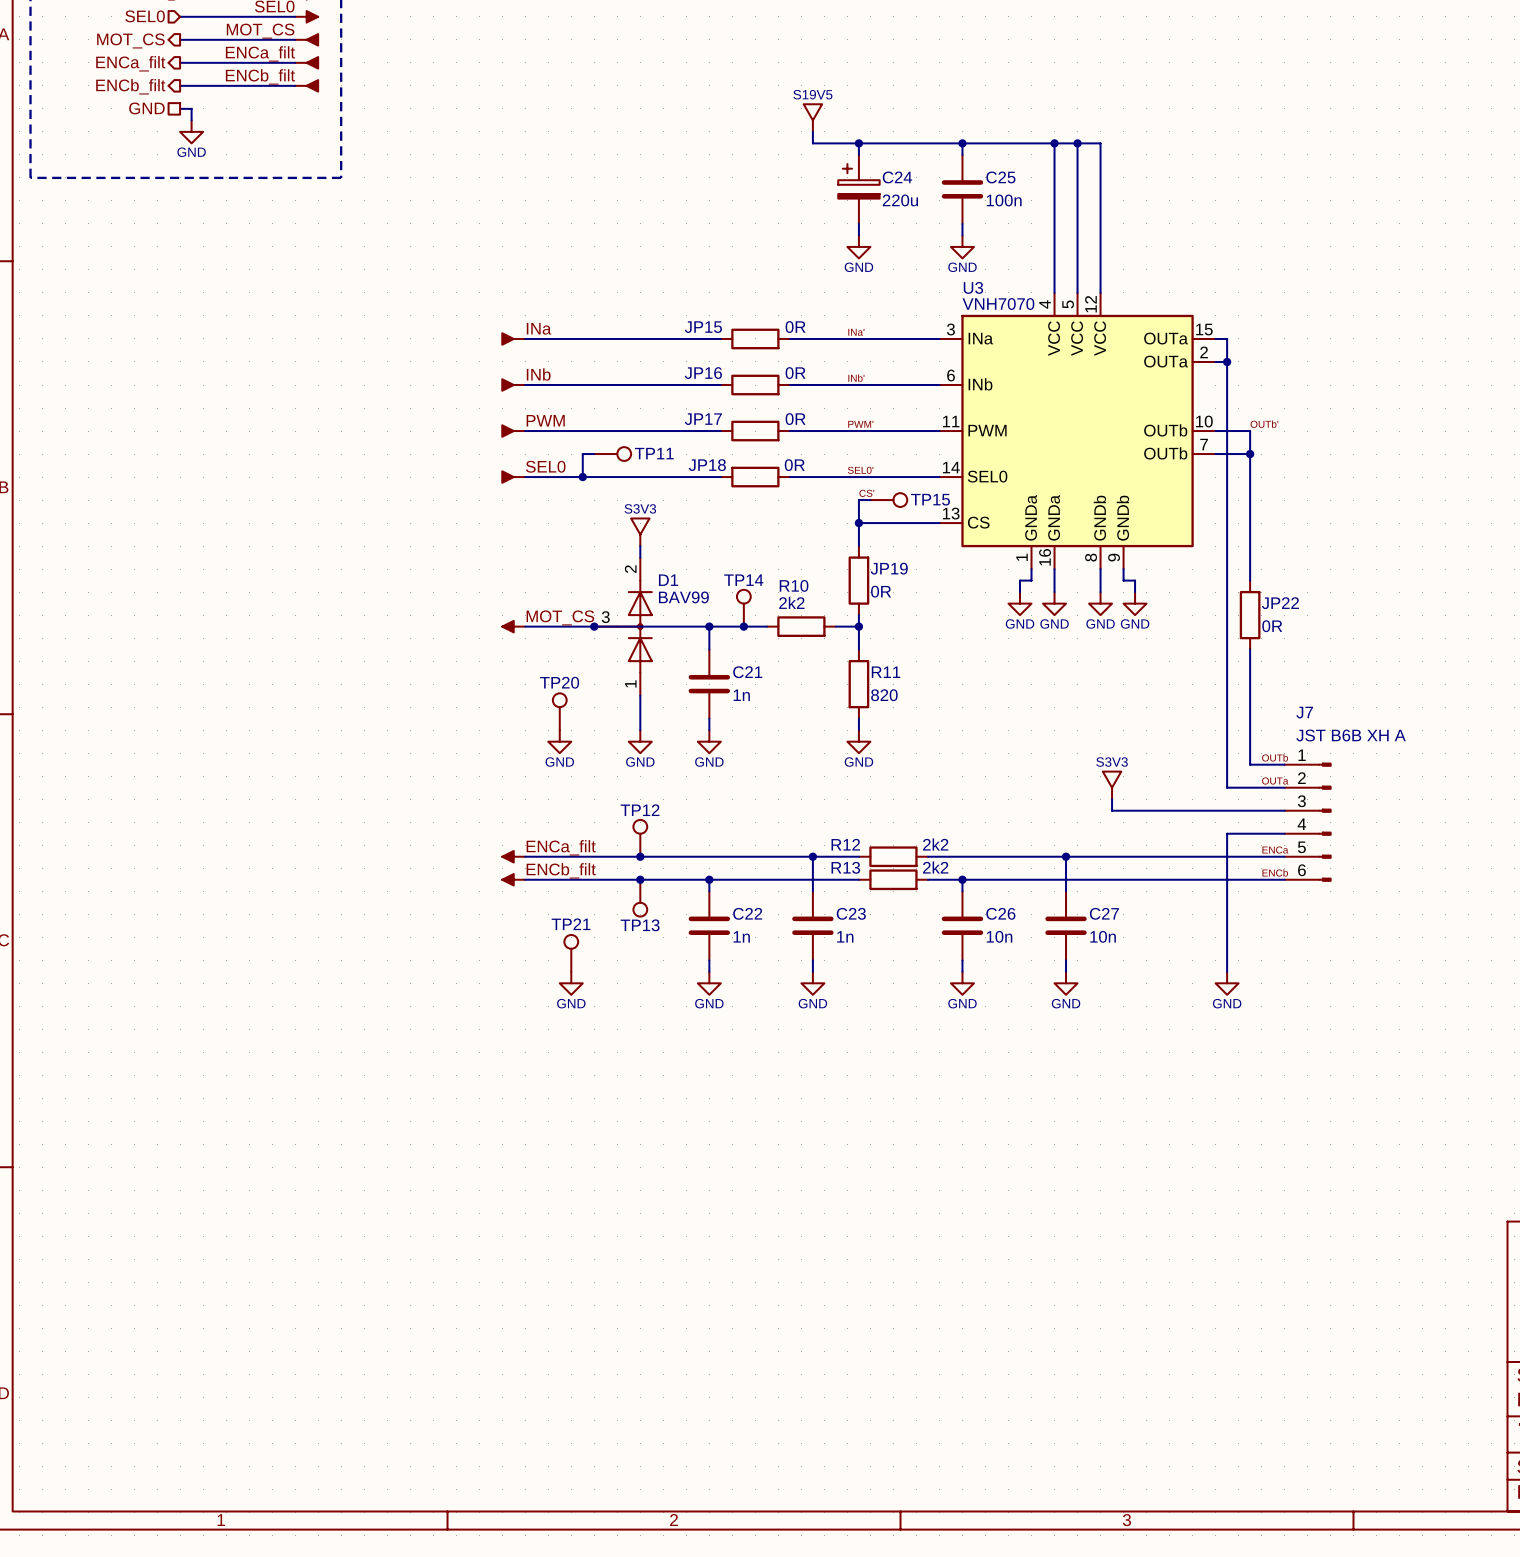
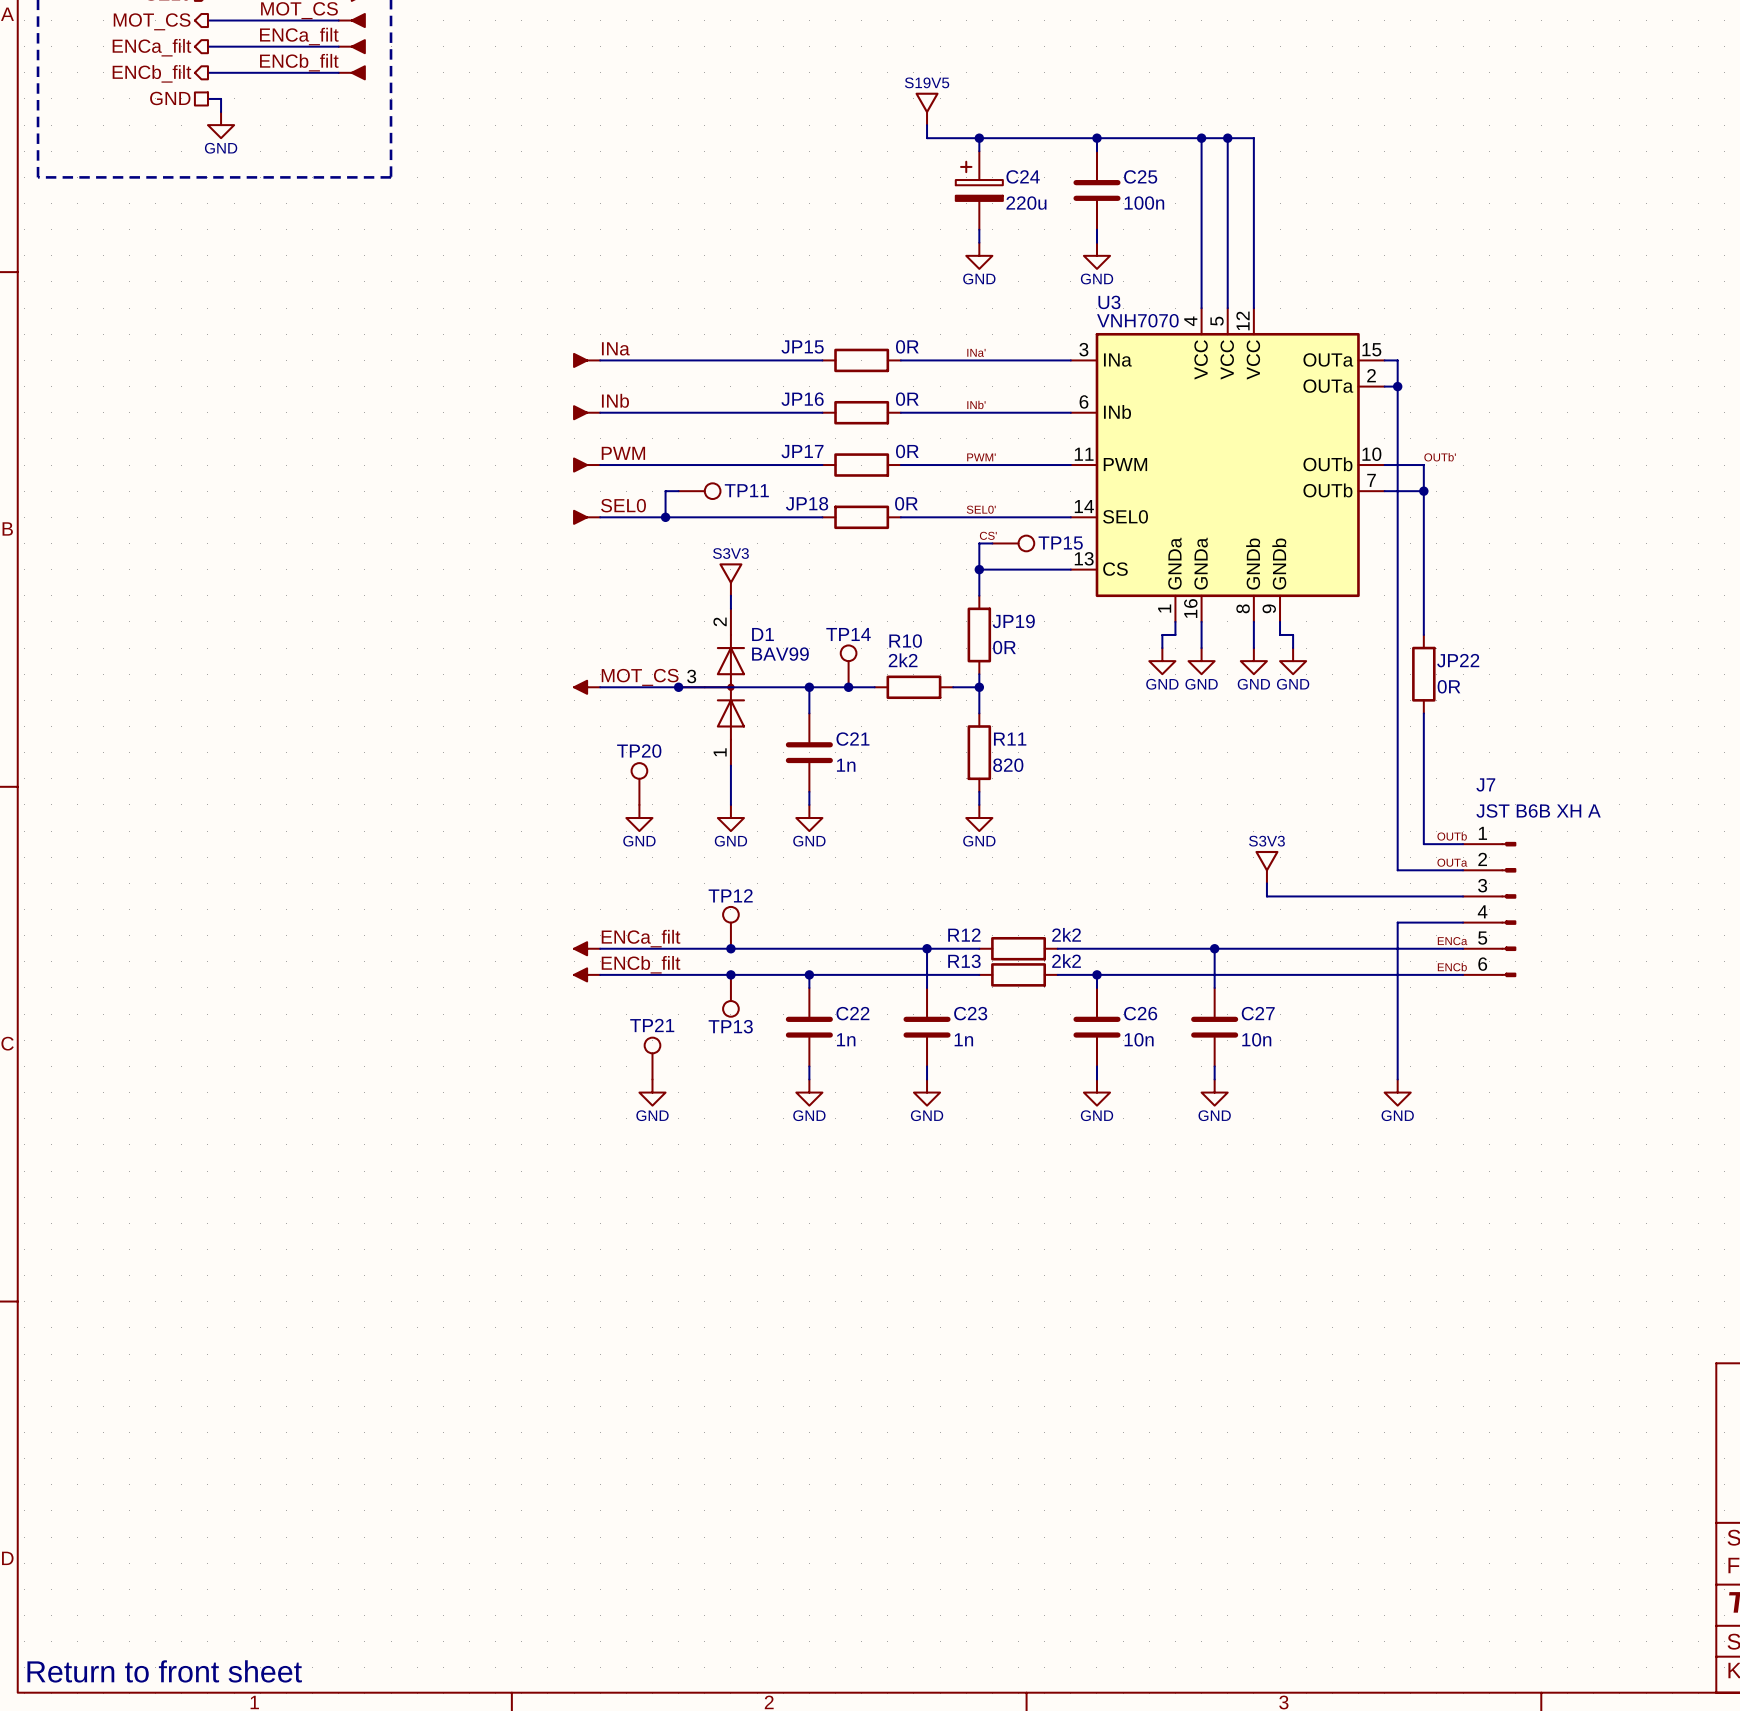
text: none -> Return to front sheet (164, 1671)

